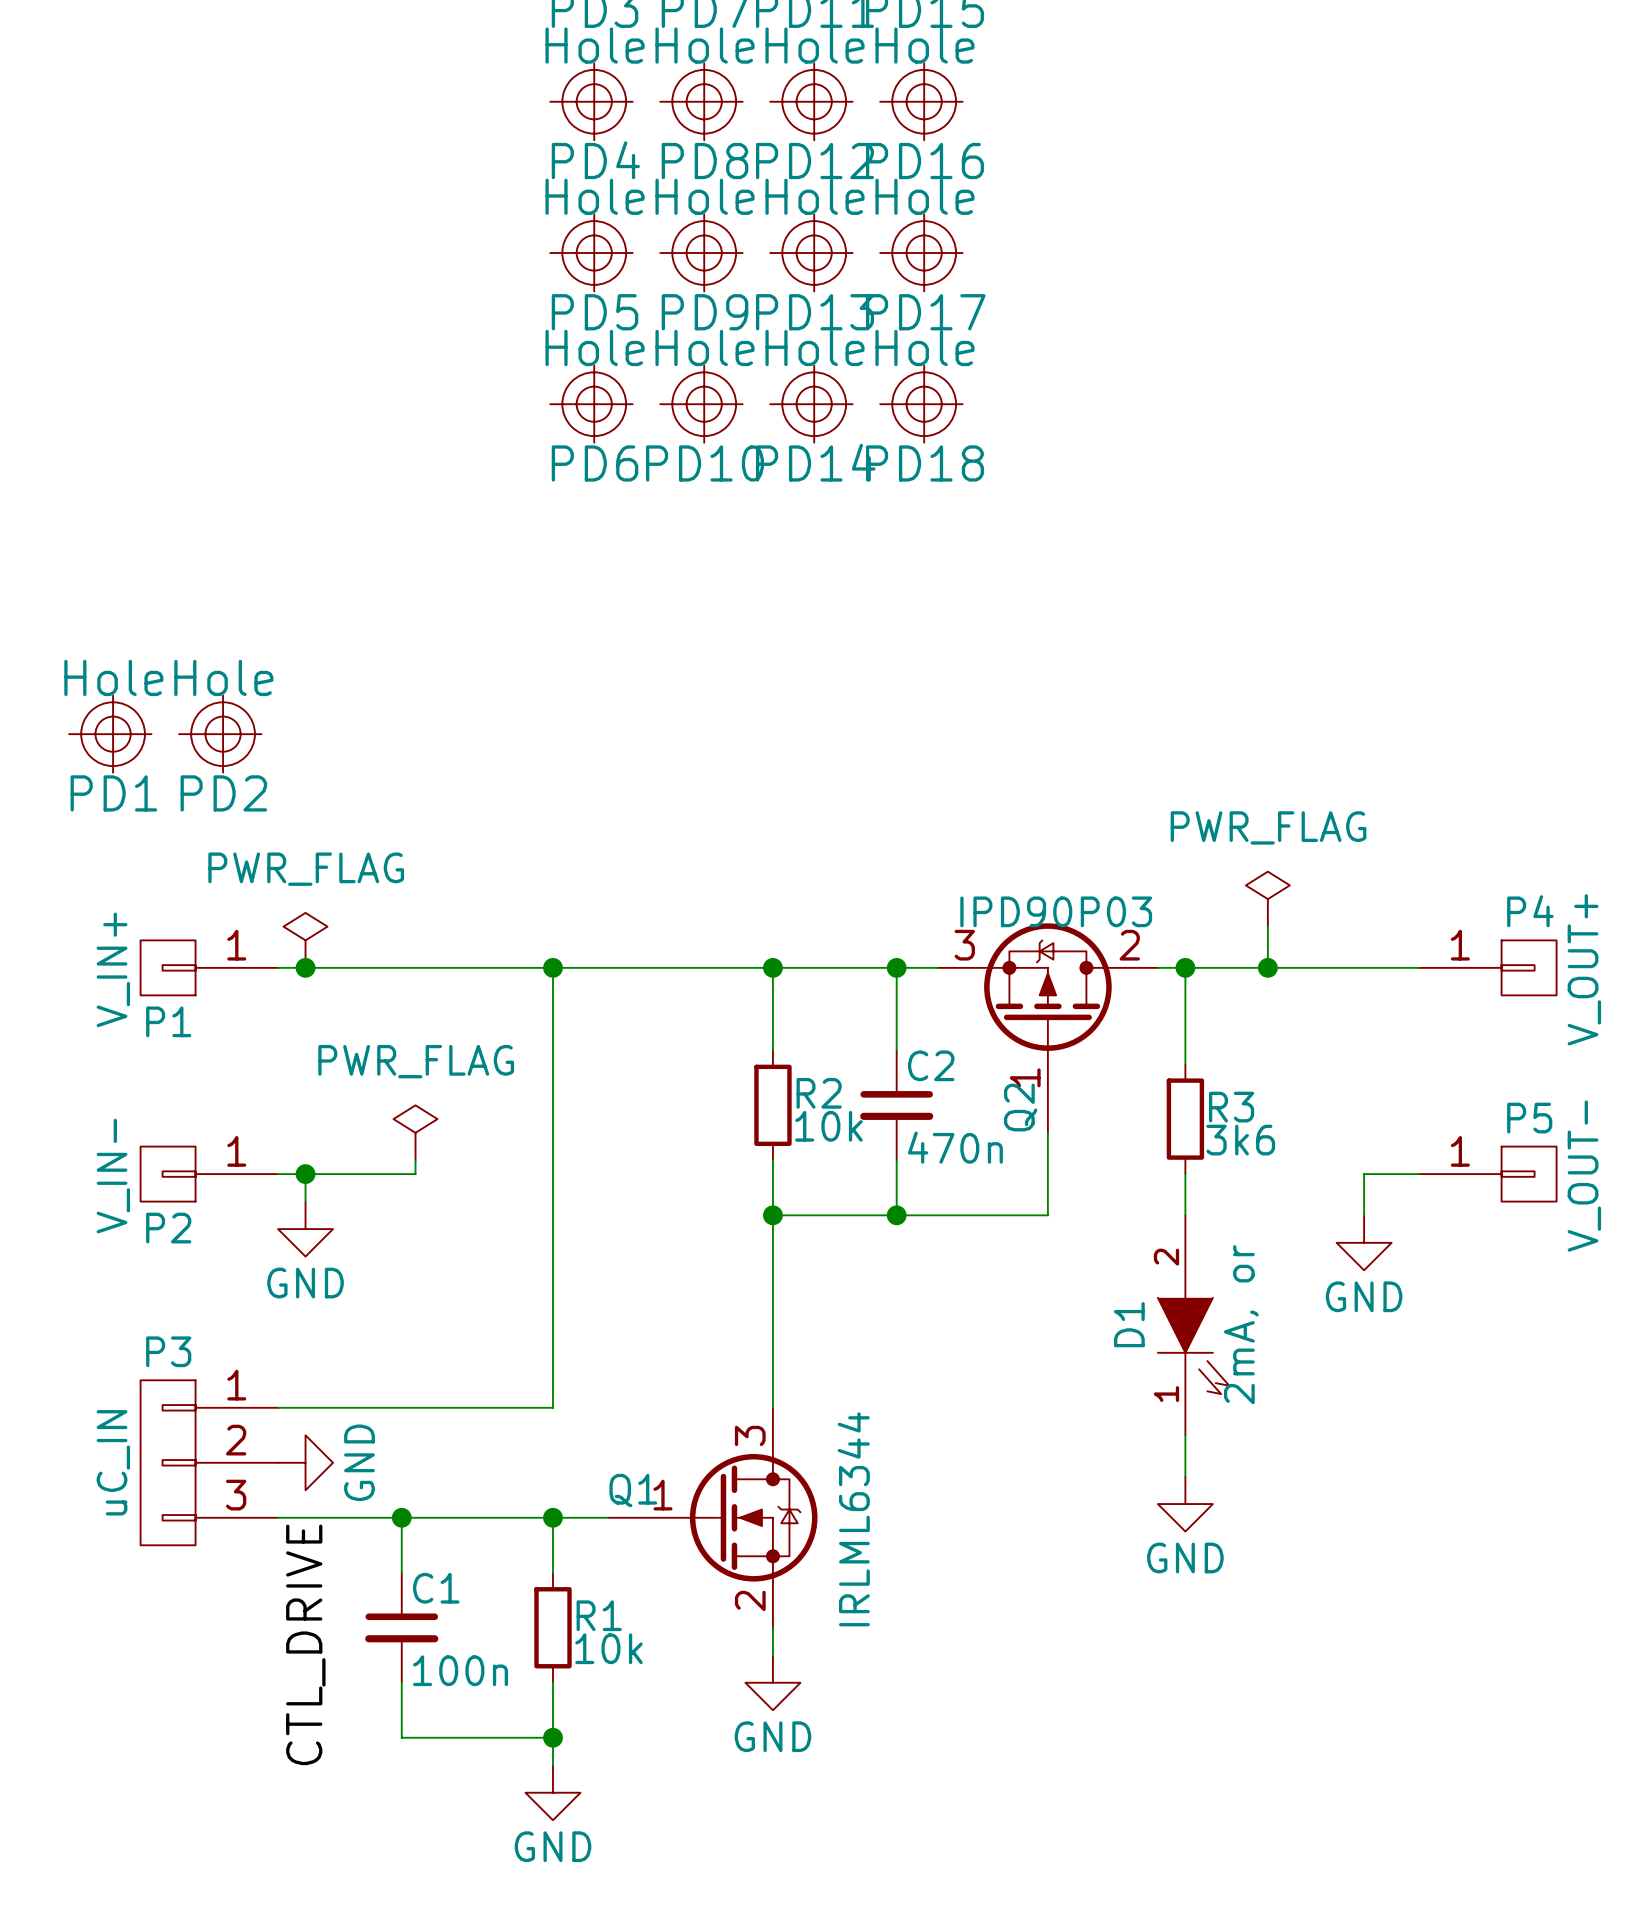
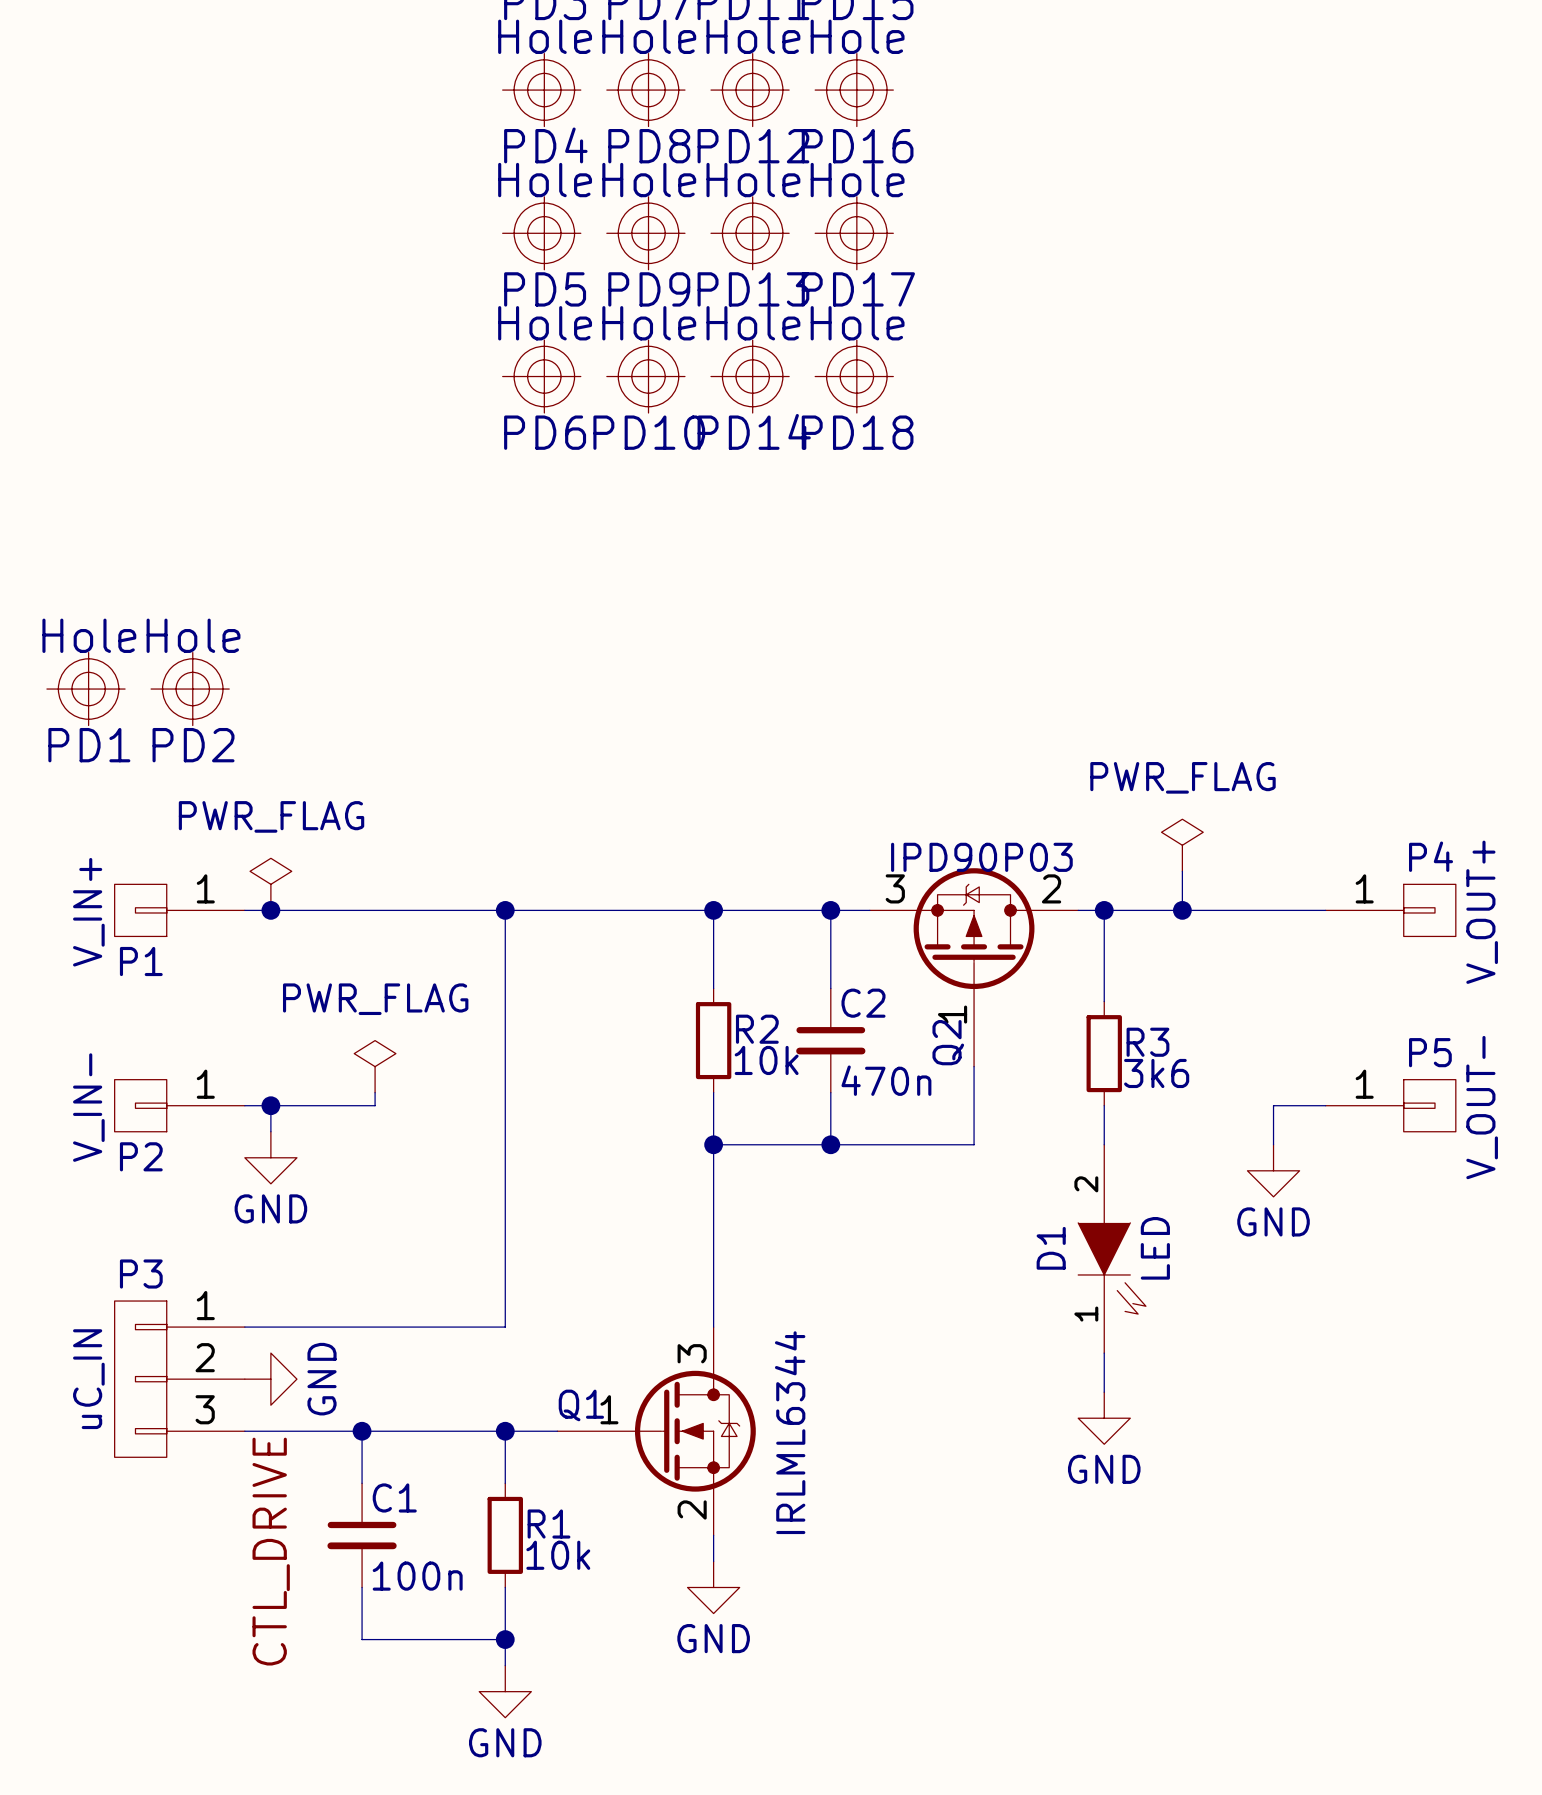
D1 value: 2mA, or (1241, 1324) -> LED (1155, 1248)

